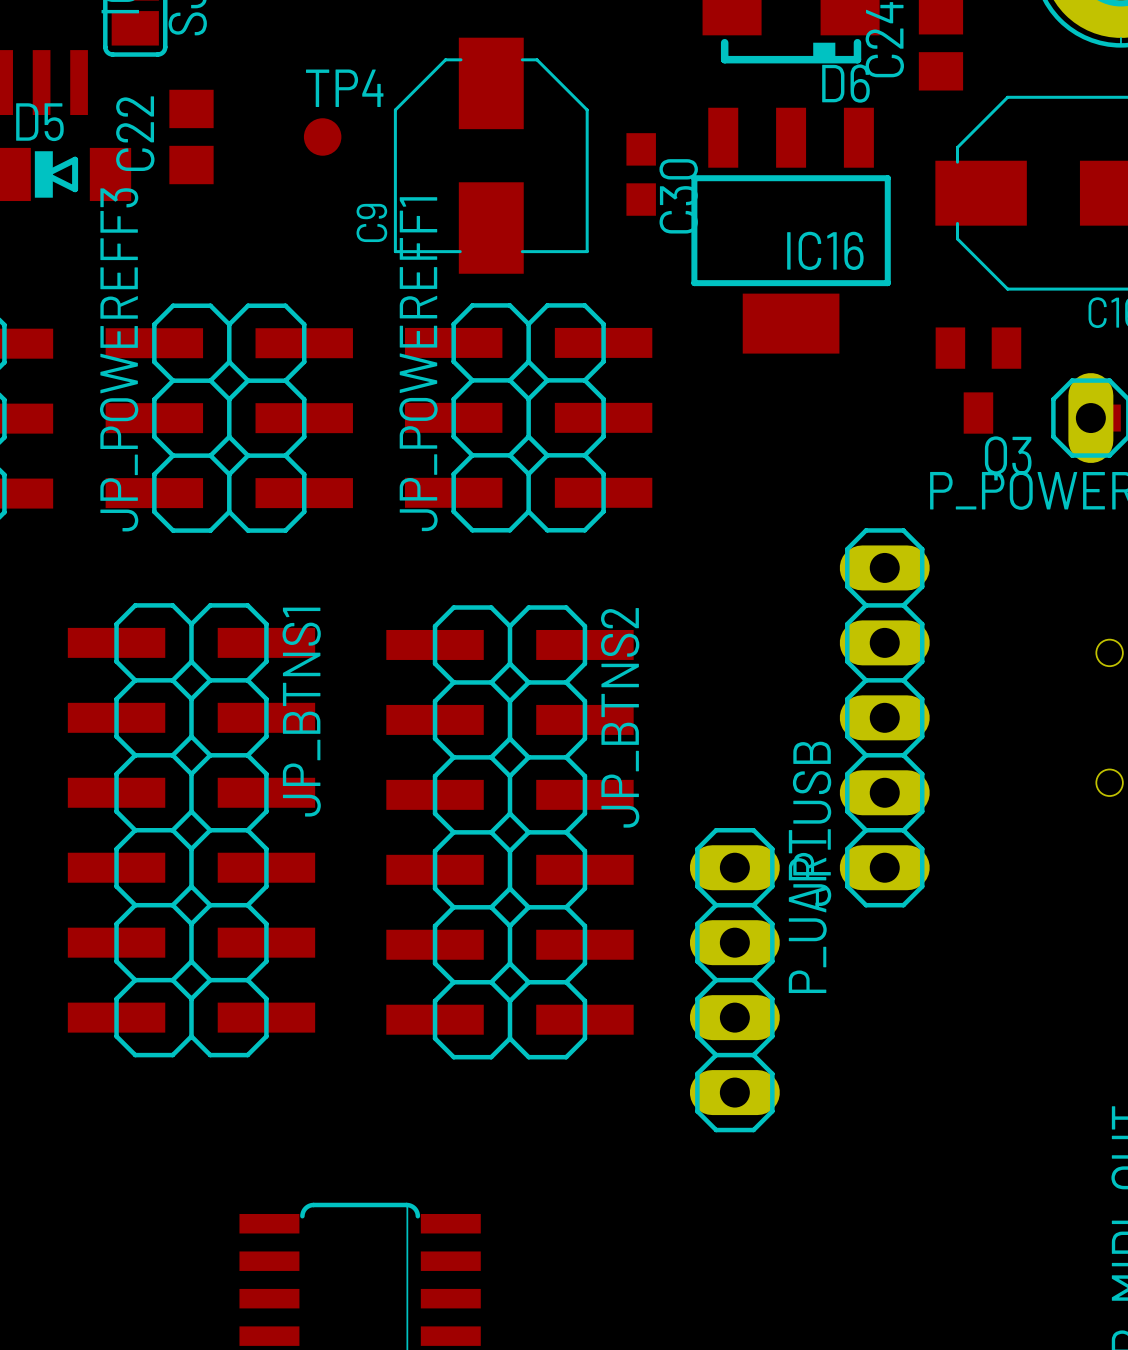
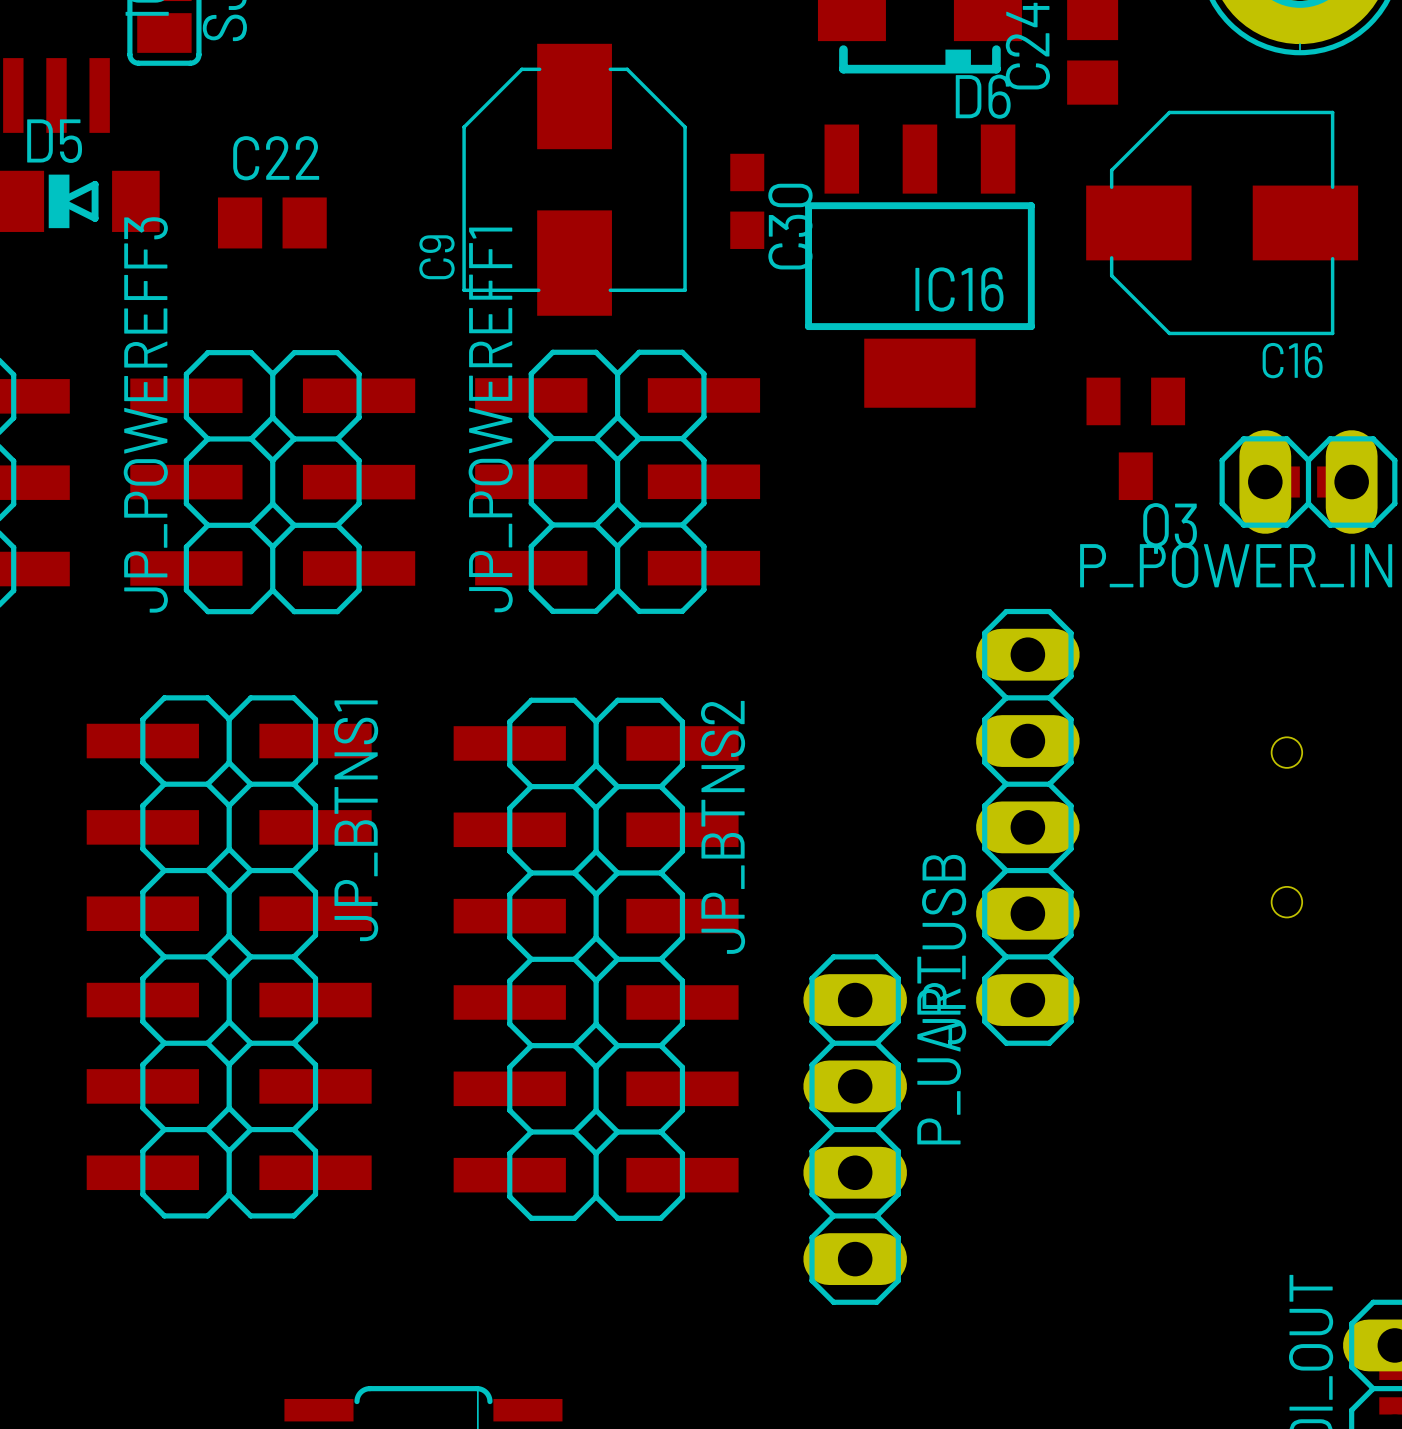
C22 rotation: 0° (191, 136) -> 90° clockwise (272, 222)
C22 position: (191, 136) -> (272, 222)
TP4: (322, 136) -> none

